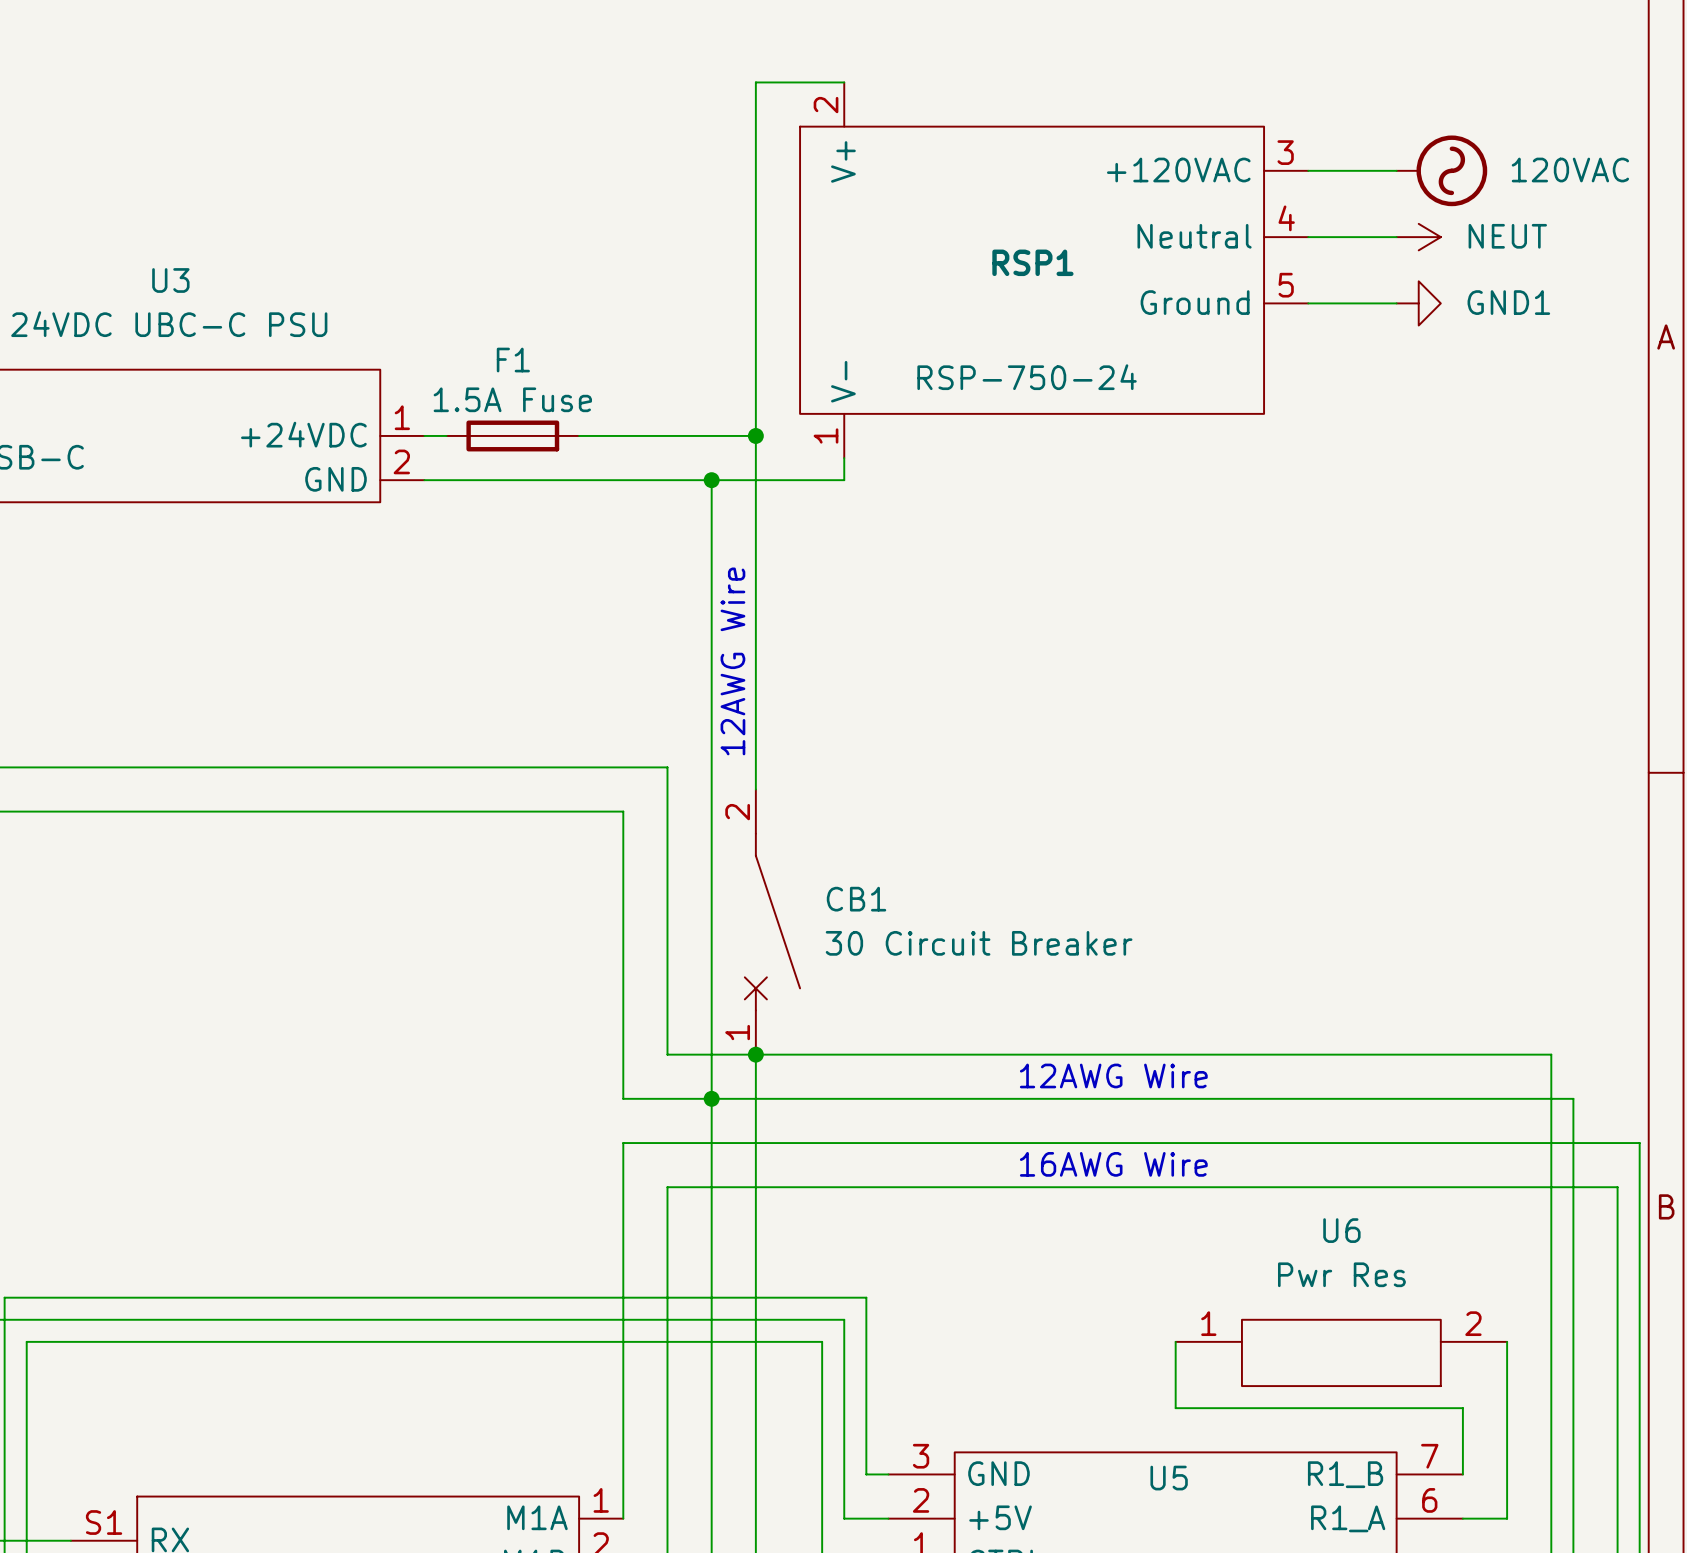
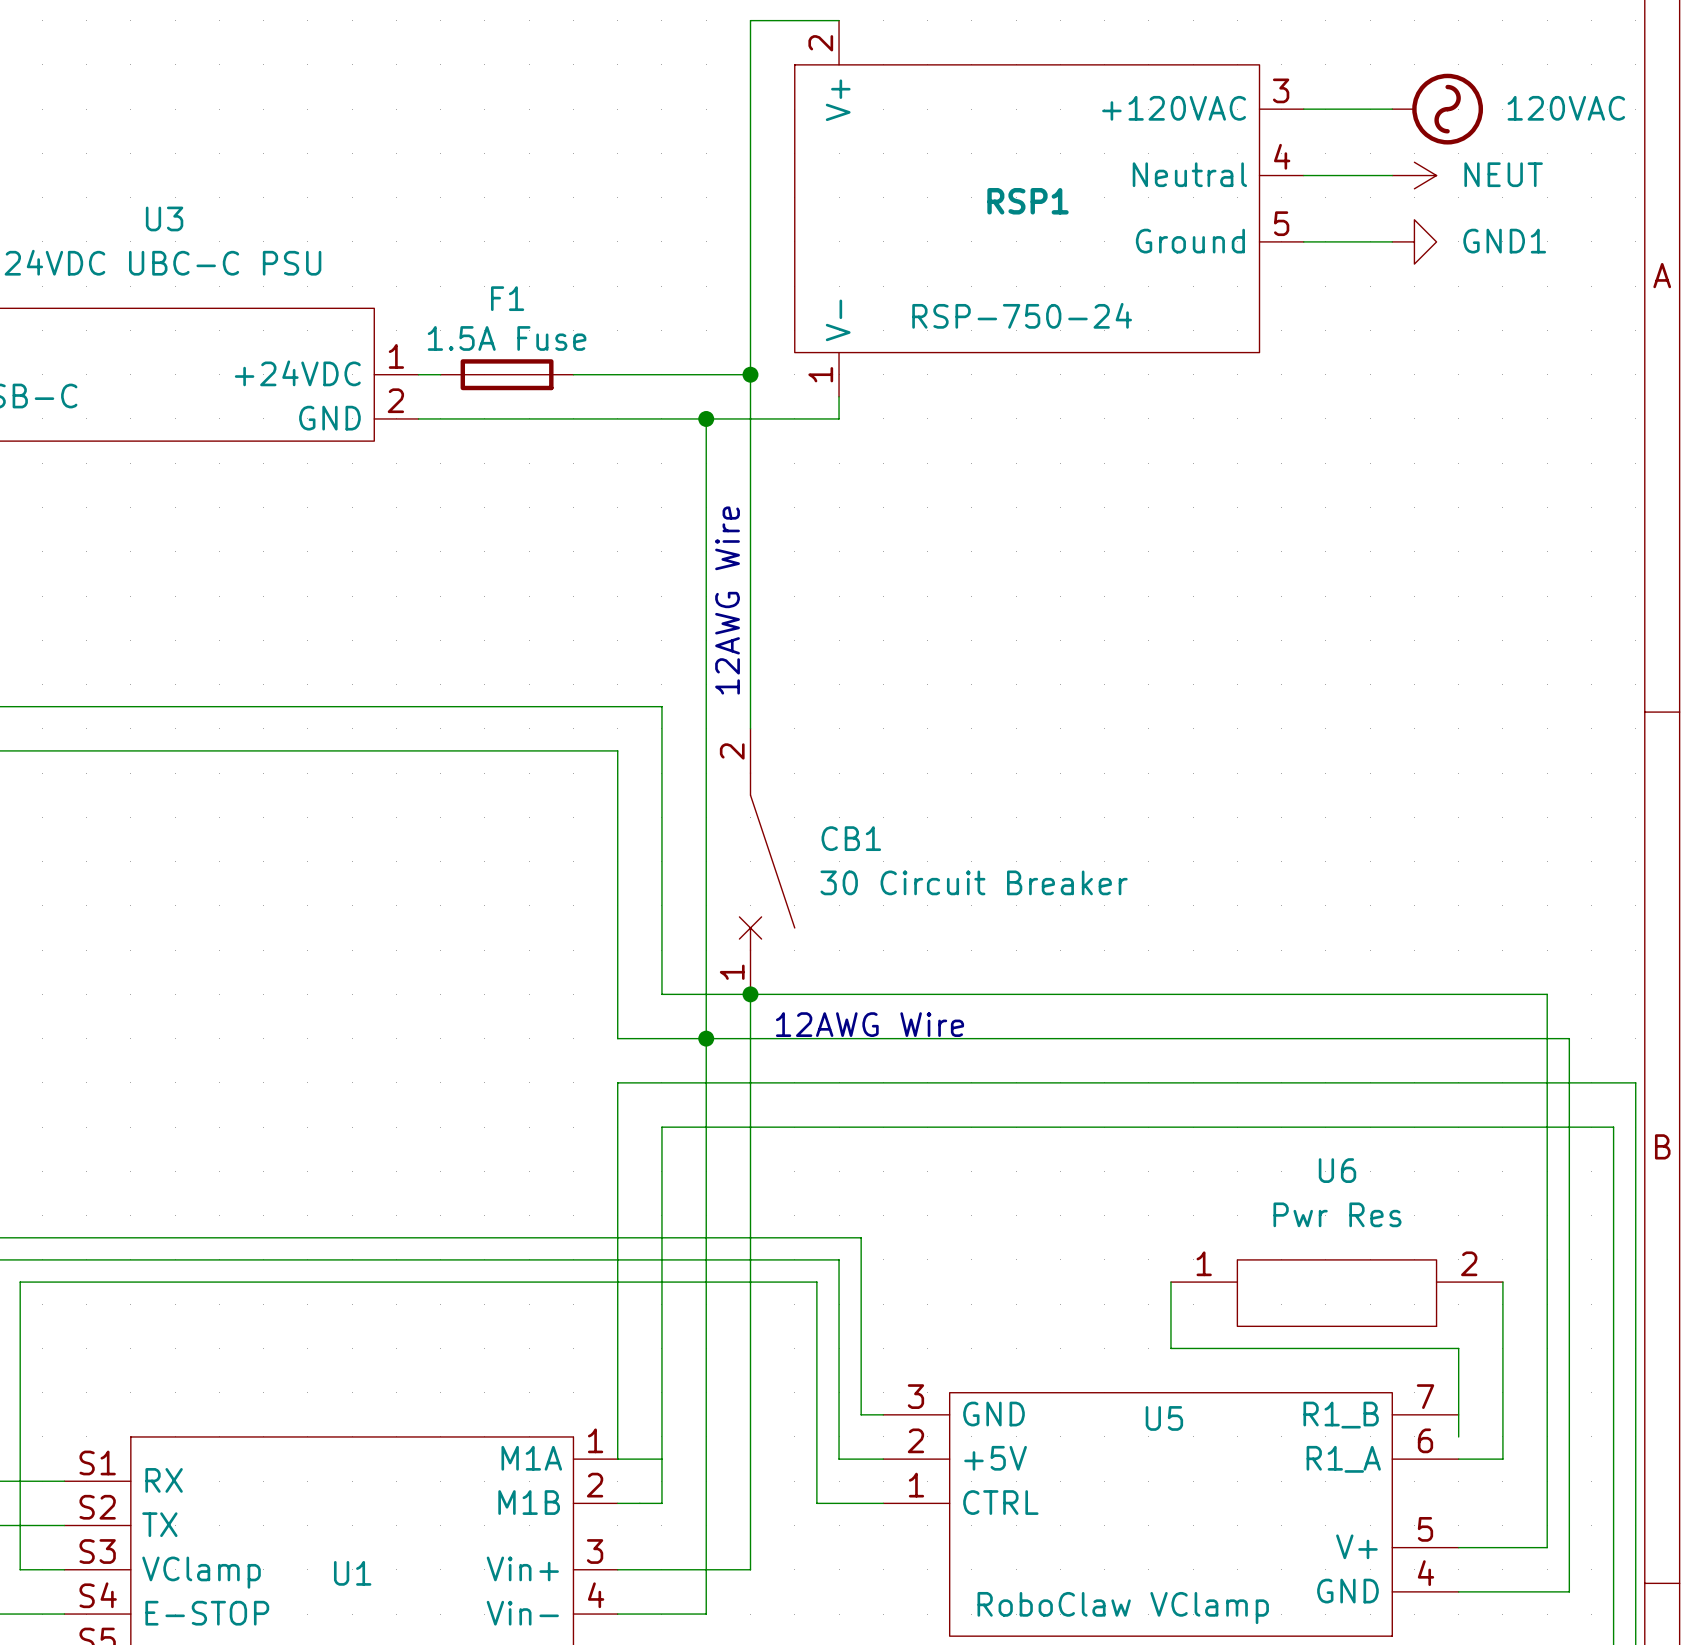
text position: 12AWG Wire (1113, 1075) -> 12AWG Wire (870, 1024)
text: 16AWG Wire (1113, 1164) -> none
wire: none -> (1458, 1414) (1458, 1436)
wire: none -> (617, 1459) (661, 1459)

